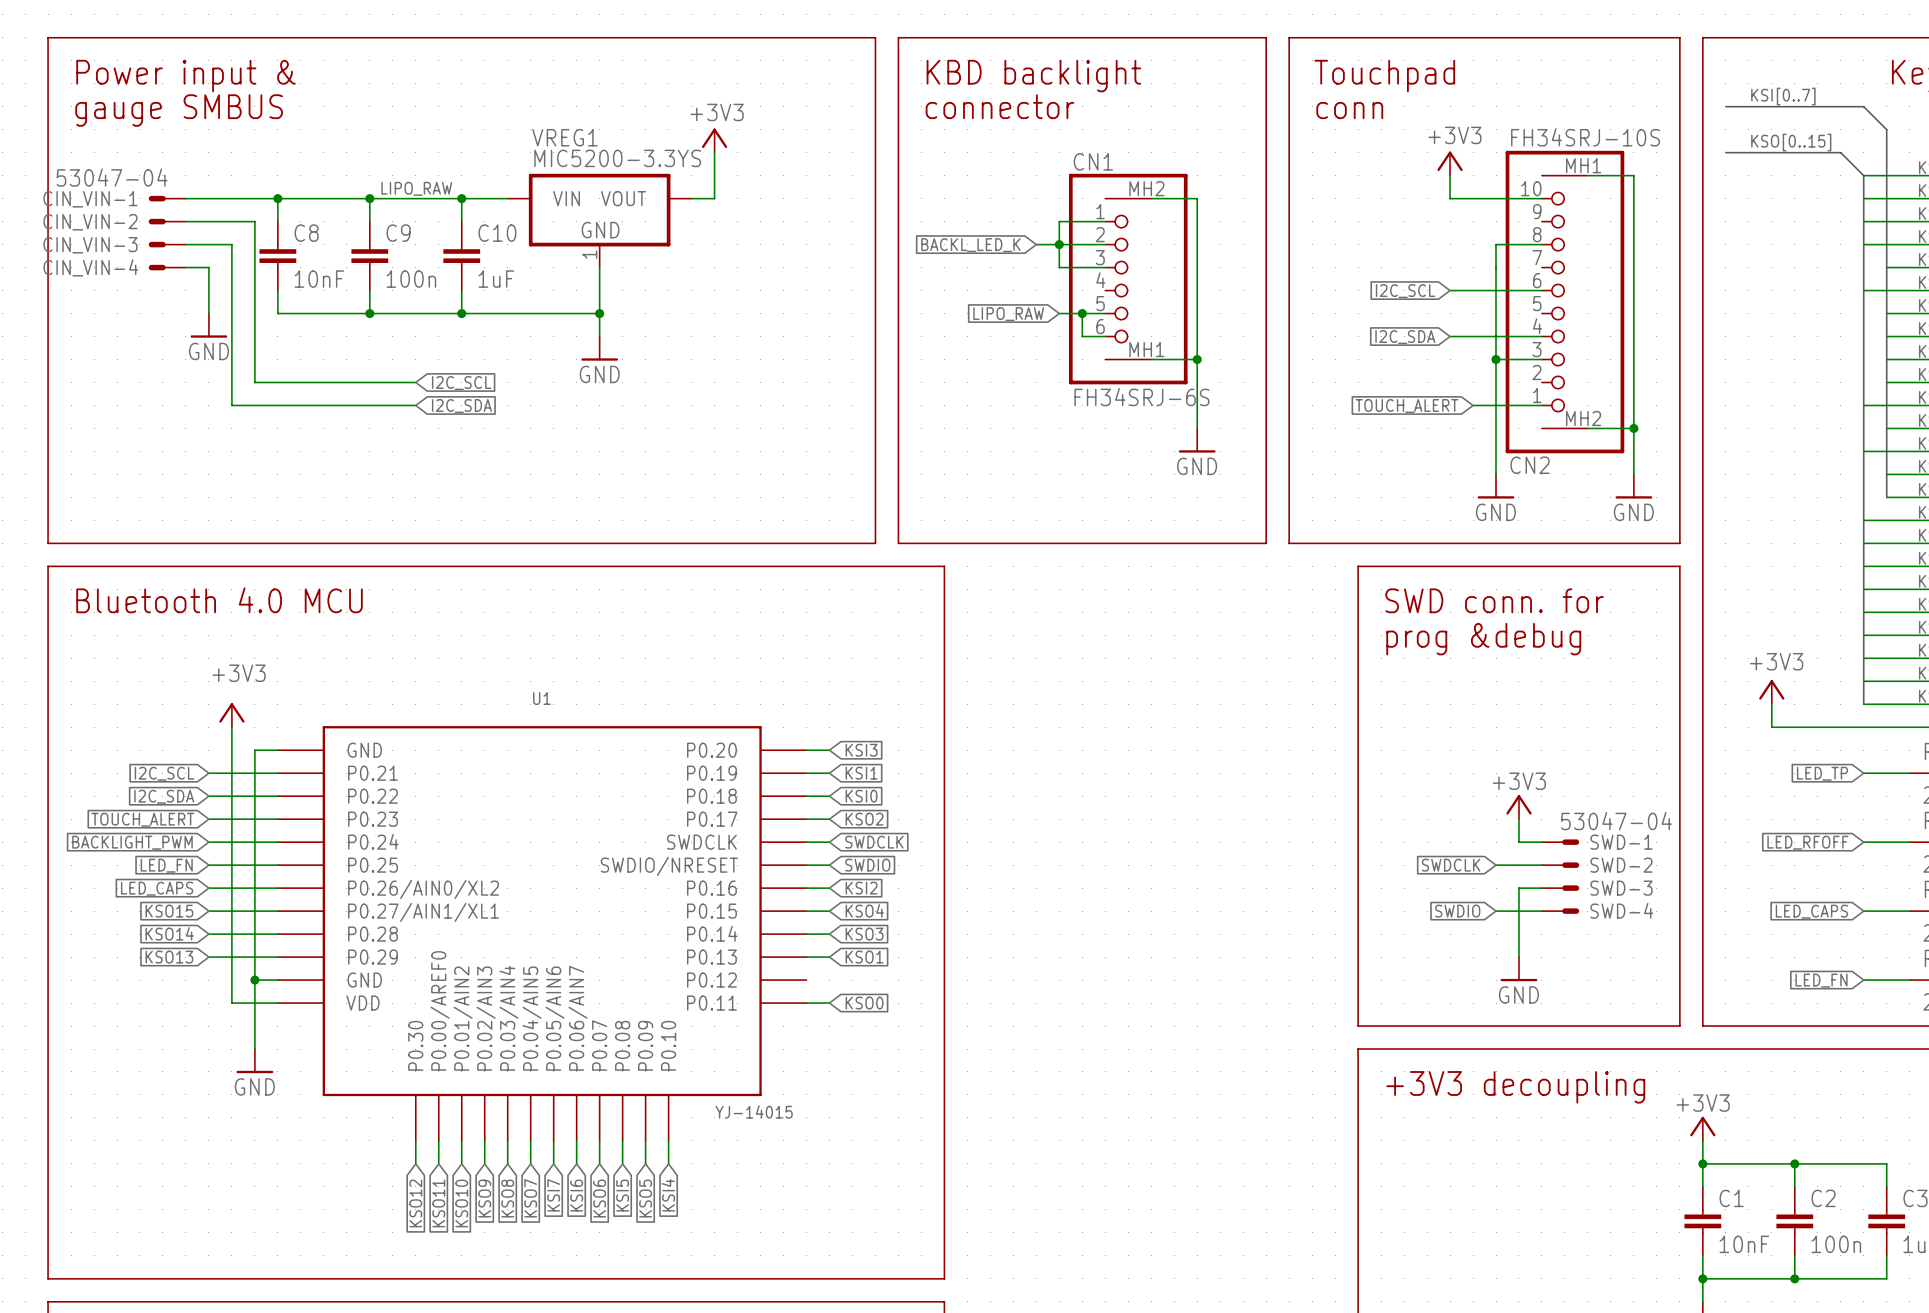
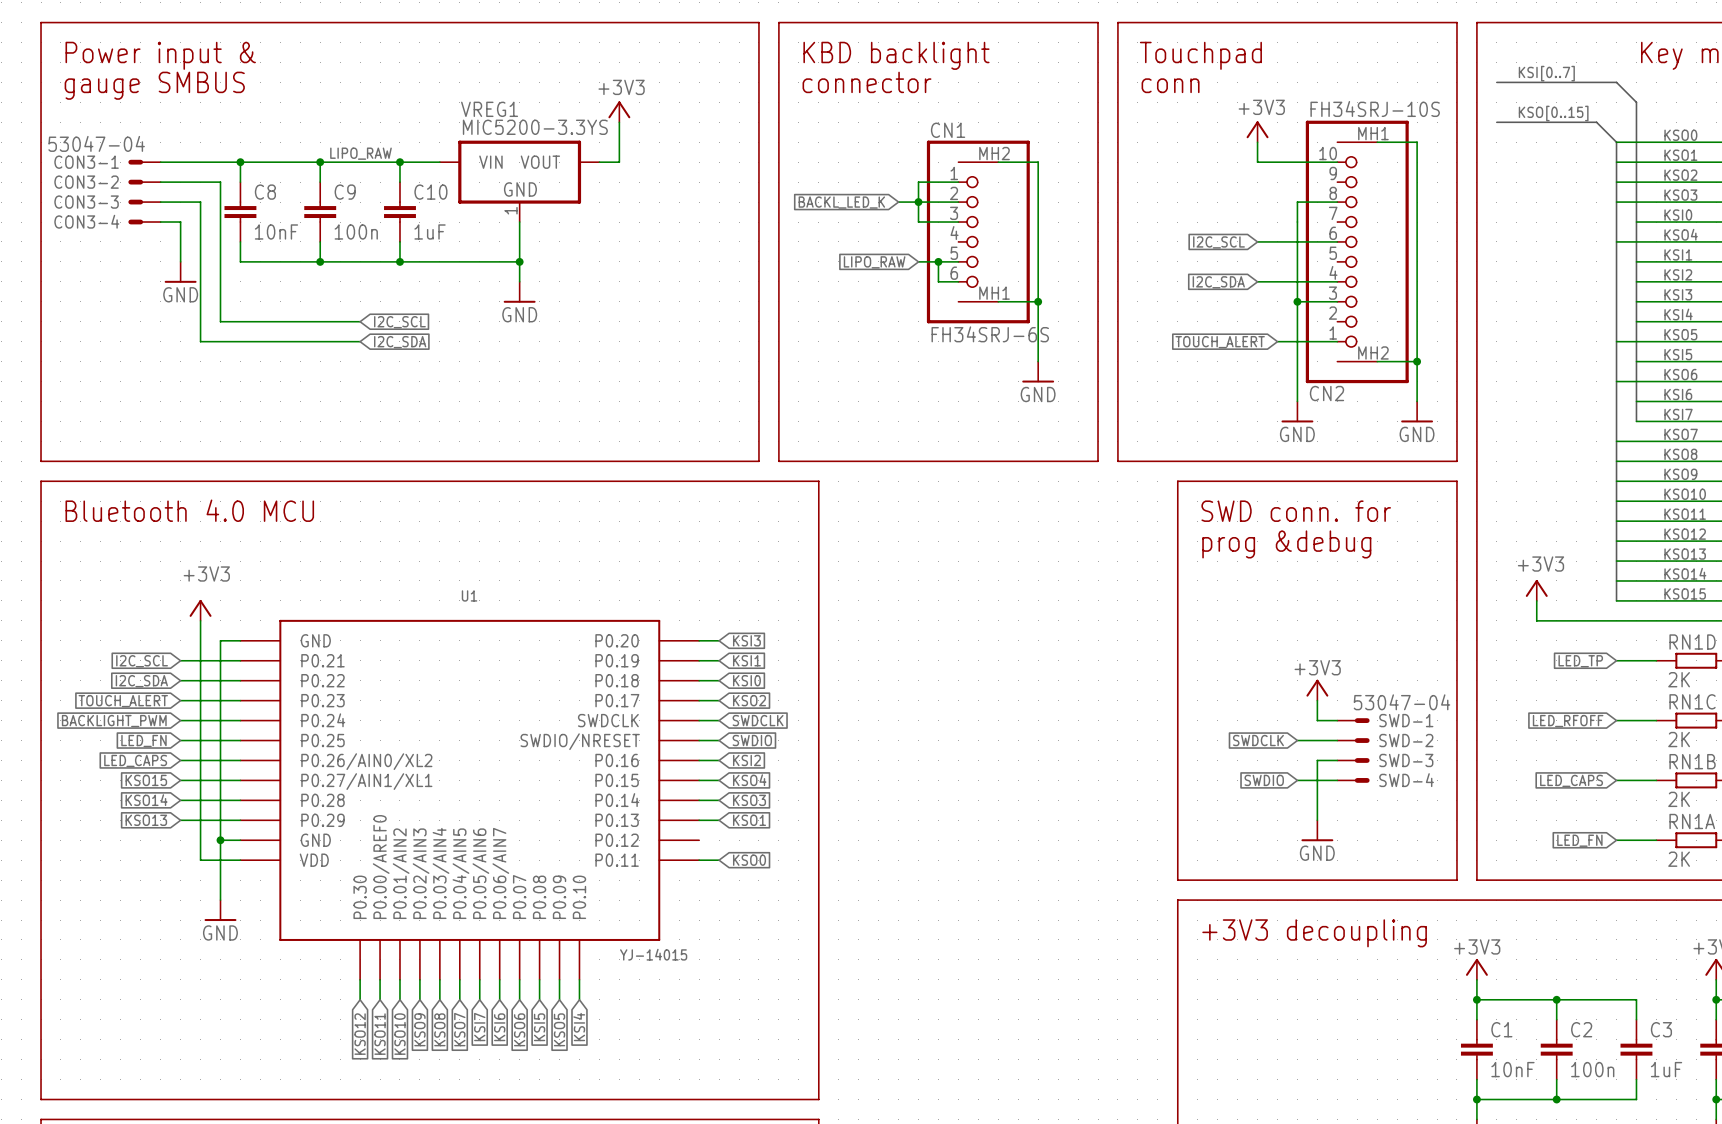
CIN_VIN-1 name: CIN_VIN-1 (90, 199) -> CON3-1 (86, 162)
CIN_VIN-2 name: CIN_VIN-2 (90, 222) -> CON3-2 (86, 182)
CIN_VIN-3 name: CIN_VIN-3 (90, 245) -> CON3-3 (86, 202)
CIN_VIN-4 name: CIN_VIN-4 (90, 267) -> CON3-4 (86, 221)

